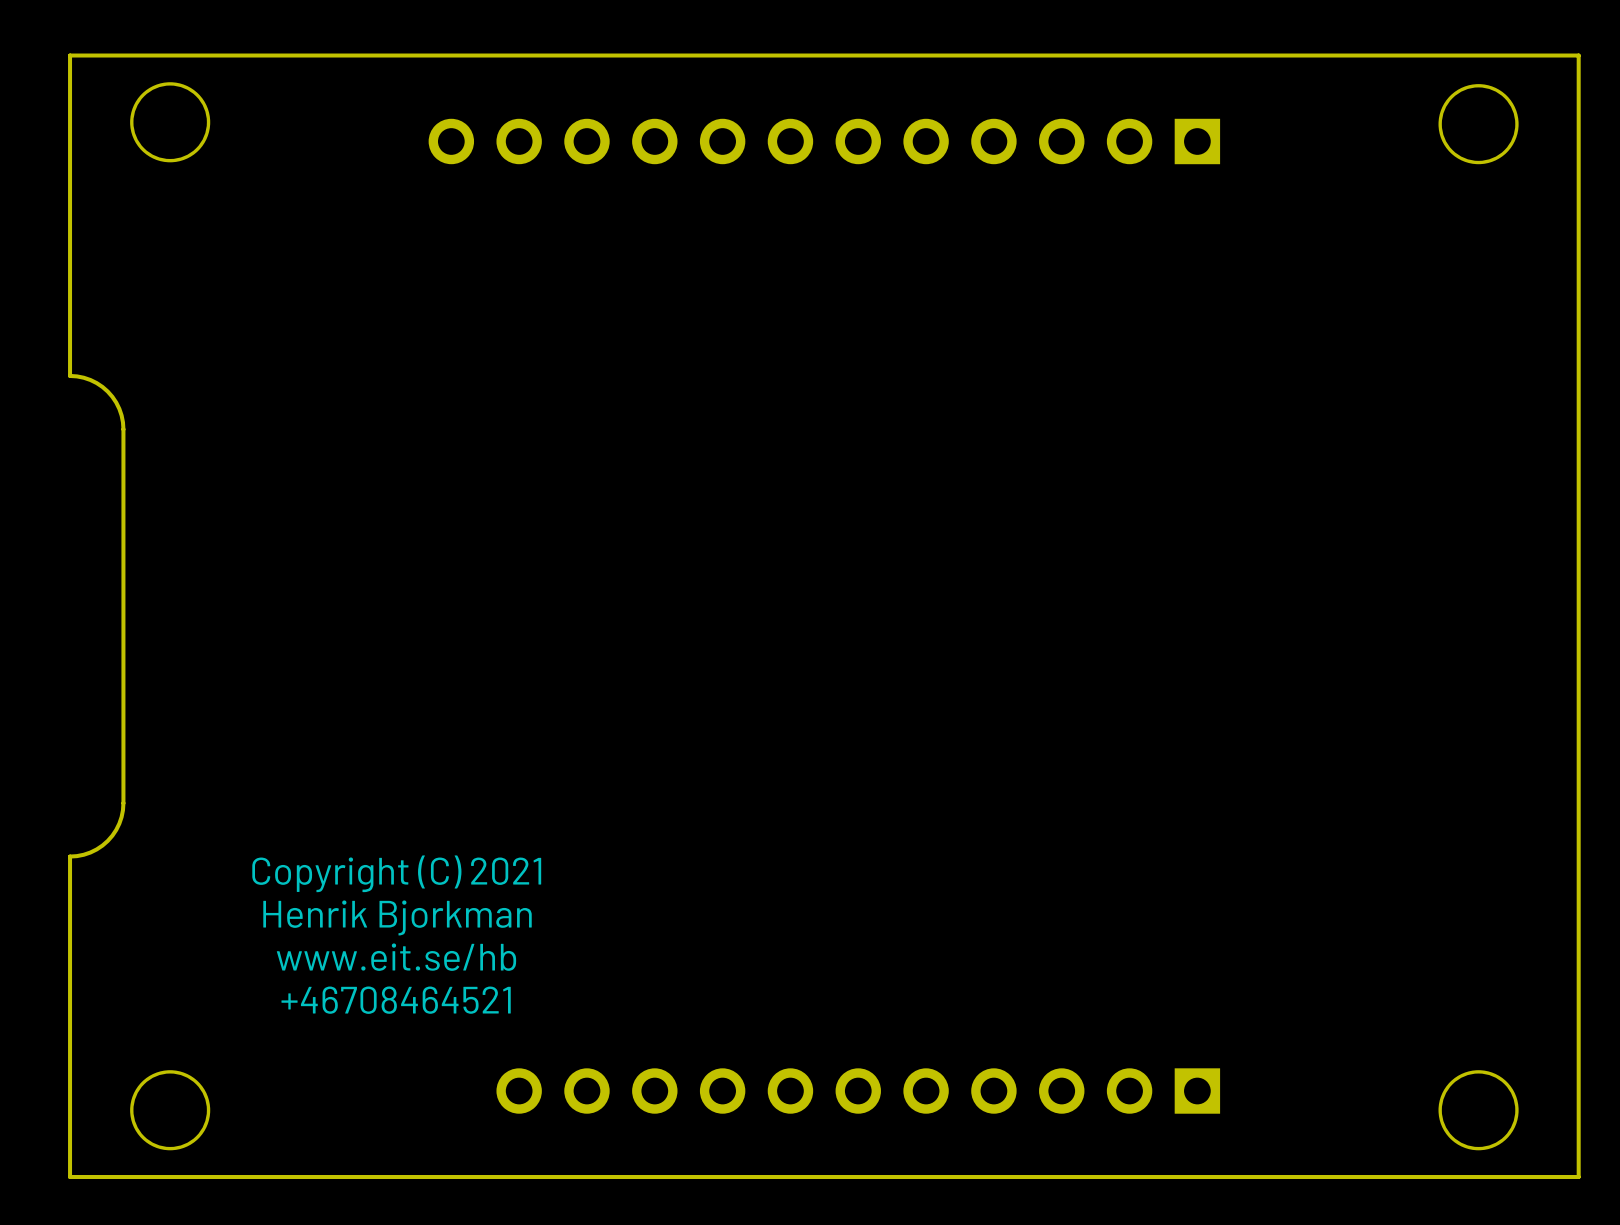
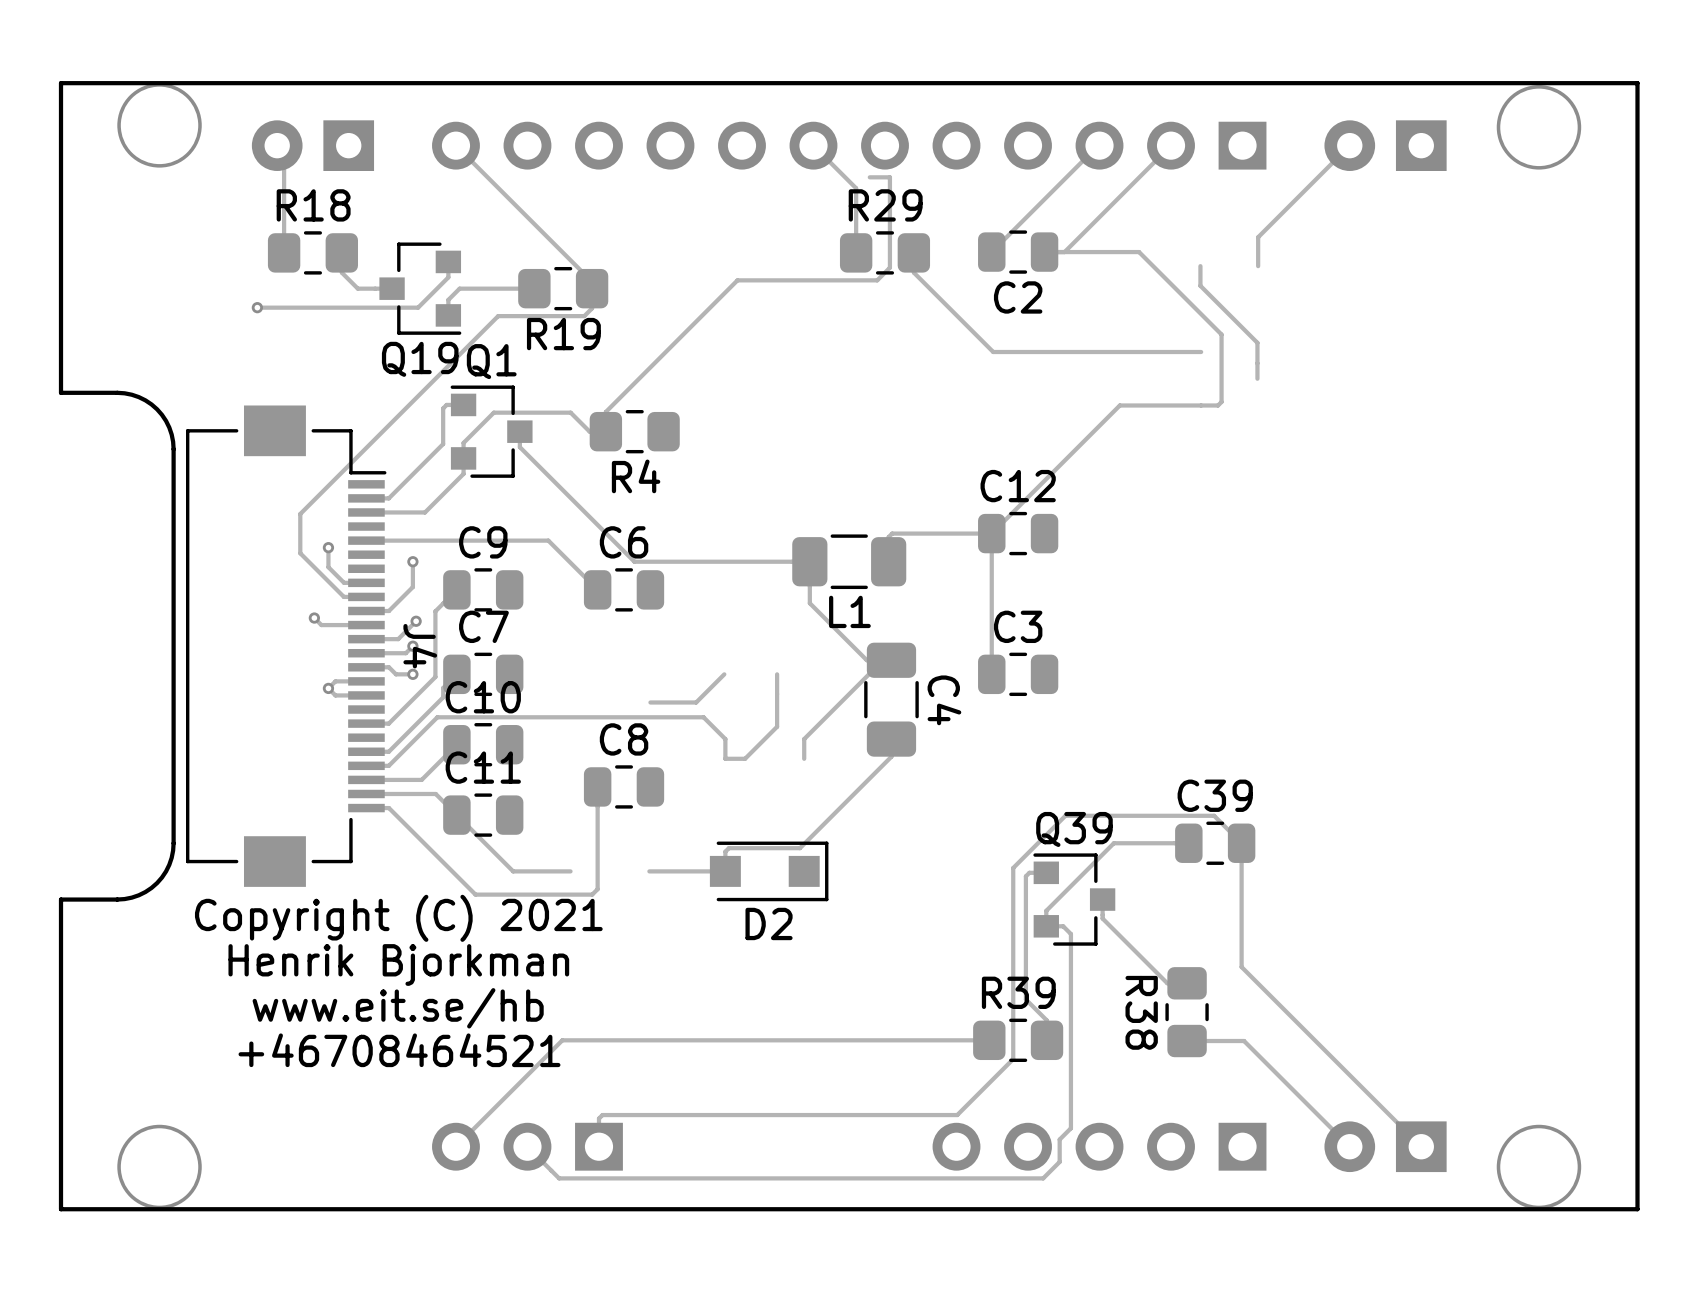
board edge: (1578, 55) (70, 55) (70, 375) (90, 380) (107, 391) (119, 408) (123, 429) (122, 810) (116, 829) (107, 840) (90, 852) (70, 856) (70, 1176) (1578, 1176) (1578, 55) -> (1637, 83) (1637, 1209) (61, 1209) (61, 899) (124, 899) (145, 892) (157, 883) (166, 871) (171, 857) (173, 843) (173, 441) (169, 427) (161, 414) (151, 404) (138, 397) (117, 392) (61, 392) (61, 83) (1637, 83)
track: none -> (277, 145) (284, 152) (284, 252)
part: none -> (312, 145)
track: none -> (455, 145) (592, 281) (592, 308) (584, 316) (498, 316) (300, 514) (300, 553) (343, 596) (366, 596)
track: none -> (813, 145) (856, 188) (856, 252)
track: none -> (1099, 145) (991, 252)
track: none -> (1171, 145) (1064, 252)
track: none -> (1349, 145) (1258, 237) (1258, 266)
part: none -> (1385, 145)
track: none -> (869, 177) (889, 177) (889, 267) (877, 280) (737, 280) (605, 411) (605, 431) (589, 431) (570, 412) (493, 412) (463, 442) (463, 473) (425, 512) (366, 512)
C2: none -> (1018, 252)
track: none -> (1044, 252) (1139, 252) (1221, 334) (1221, 401) (1218, 405) (1119, 405) (991, 533)
R18: none -> (312, 252)
track: none -> (341, 252) (341, 272) (357, 288) (392, 288)
R29: none -> (885, 252)
track: none -> (913, 252) (913, 272) (993, 352) (1201, 352)
track: none -> (448, 261) (448, 277) (418, 307) (257, 307)
track: none -> (1200, 266) (1200, 285) (1257, 342) (1257, 378)
Q19: none -> (420, 288)
track: none -> (534, 288) (459, 288) (448, 299) (448, 315)
R19: none -> (563, 288)
via: none -> (257, 307)
track: none -> (463, 404) (446, 404) (443, 408) (443, 444) (388, 498) (366, 498)
Q1: none -> (491, 431)
track: none -> (519, 431) (519, 447) (634, 561) (809, 561) (809, 603) (866, 660) (891, 660)
R4: none -> (634, 431)
track: none -> (991, 533) (892, 533) (888, 537) (888, 561)
track: none -> (991, 533) (991, 674)
C12: none -> (1018, 533)
track: none -> (366, 540) (548, 540) (597, 589)
track: none -> (328, 547) (328, 567) (344, 582) (366, 582)
via: none -> (328, 547)
track: none -> (412, 561) (412, 587) (388, 611) (366, 611)
via: none -> (412, 561)
L1: none -> (849, 561)
track: none -> (456, 589) (435, 611) (435, 677) (388, 723) (366, 723)
C9: none -> (483, 589)
C6: none -> (624, 589)
track: none -> (314, 618) (321, 625) (366, 625)
via: none -> (314, 618)
track: none -> (416, 621) (398, 639) (366, 639)
via: none -> (416, 621)
J4: none -> (286, 646)
track: none -> (412, 646) (405, 653) (366, 653)
via: none -> (412, 646)
track: none -> (883, 660) (804, 739) (804, 758)
track: none -> (366, 667) (388, 667) (396, 674) (412, 674)
via: none -> (412, 674)
track: none -> (456, 674) (443, 688) (443, 697) (388, 751) (366, 751)
C7: none -> (483, 674)
track: none -> (724, 674) (696, 702) (650, 702)
track: none -> (777, 674) (777, 726) (745, 758) (725, 758) (725, 739) (703, 717) (437, 717) (388, 765) (366, 765)
C3: none -> (1018, 674)
track: none -> (366, 681) (335, 681) (328, 688) (335, 695) (366, 695)
via: none -> (328, 688)
C4: none -> (891, 699)
track: none -> (891, 739) (891, 756) (799, 848) (728, 848) (725, 851) (725, 871) (649, 871)
track: none -> (456, 744) (421, 779) (366, 779)
C10: none -> (483, 744)
track: none -> (597, 786) (597, 889) (592, 894) (475, 894) (388, 808) (366, 808)
C8: none -> (624, 786)
track: none -> (366, 793) (435, 793) (513, 871) (570, 871)
C11: none -> (483, 815)
track: none -> (1188, 843) (1113, 843) (1046, 910) (1046, 926) (1063, 926) (1070, 934) (1070, 1128) (1059, 1139) (1059, 1161) (1043, 1178) (559, 1178) (527, 1146)
C39: none -> (1215, 843)
D2: none -> (769, 871)
track: none -> (1046, 872) (1029, 872) (1025, 876) (1025, 999) (1047, 1020) (1047, 1040)
Q39: none -> (1074, 899)
track: none -> (1102, 899) (1102, 918) (1167, 983) (1187, 983)
R38: none -> (1187, 1012)
track: none -> (989, 1040) (562, 1040) (455, 1146)
R39: none -> (1018, 1040)
track: none -> (1187, 1041) (1244, 1041) (1349, 1146)
part: none -> (527, 1146)
part: (858, 1091) -> none
part: none -> (1385, 1146)
track: none -> (1421, 1146) (1241, 967) (1241, 843) (1214, 815) (1065, 815) (1013, 868) (1013, 1059) (957, 1115) (602, 1115) (598, 1118) (598, 1146)

